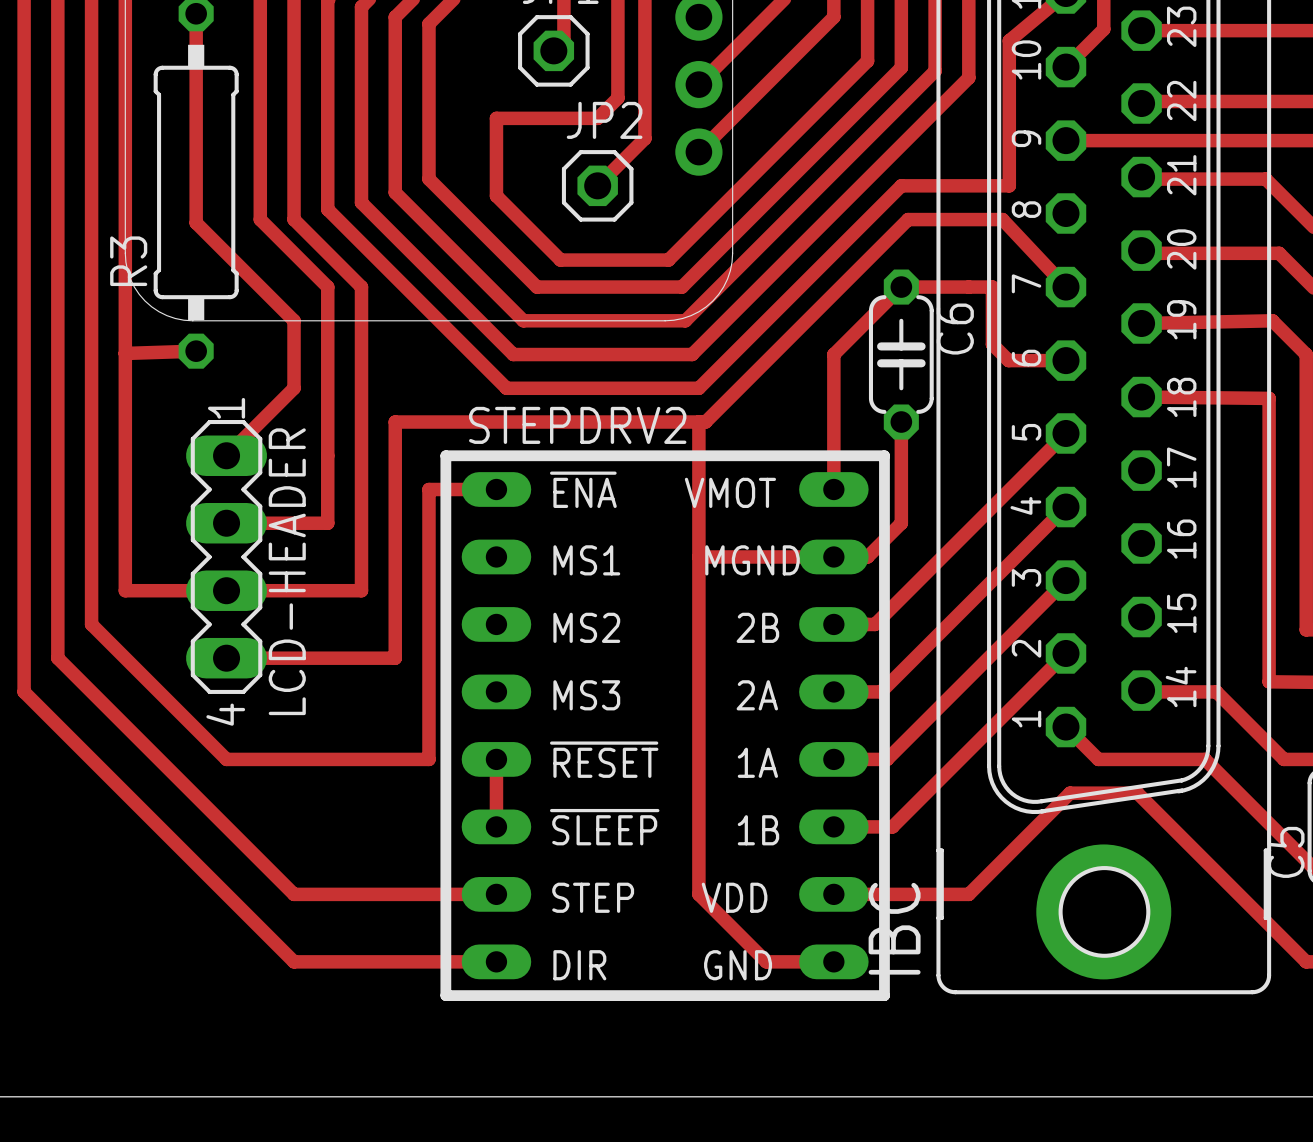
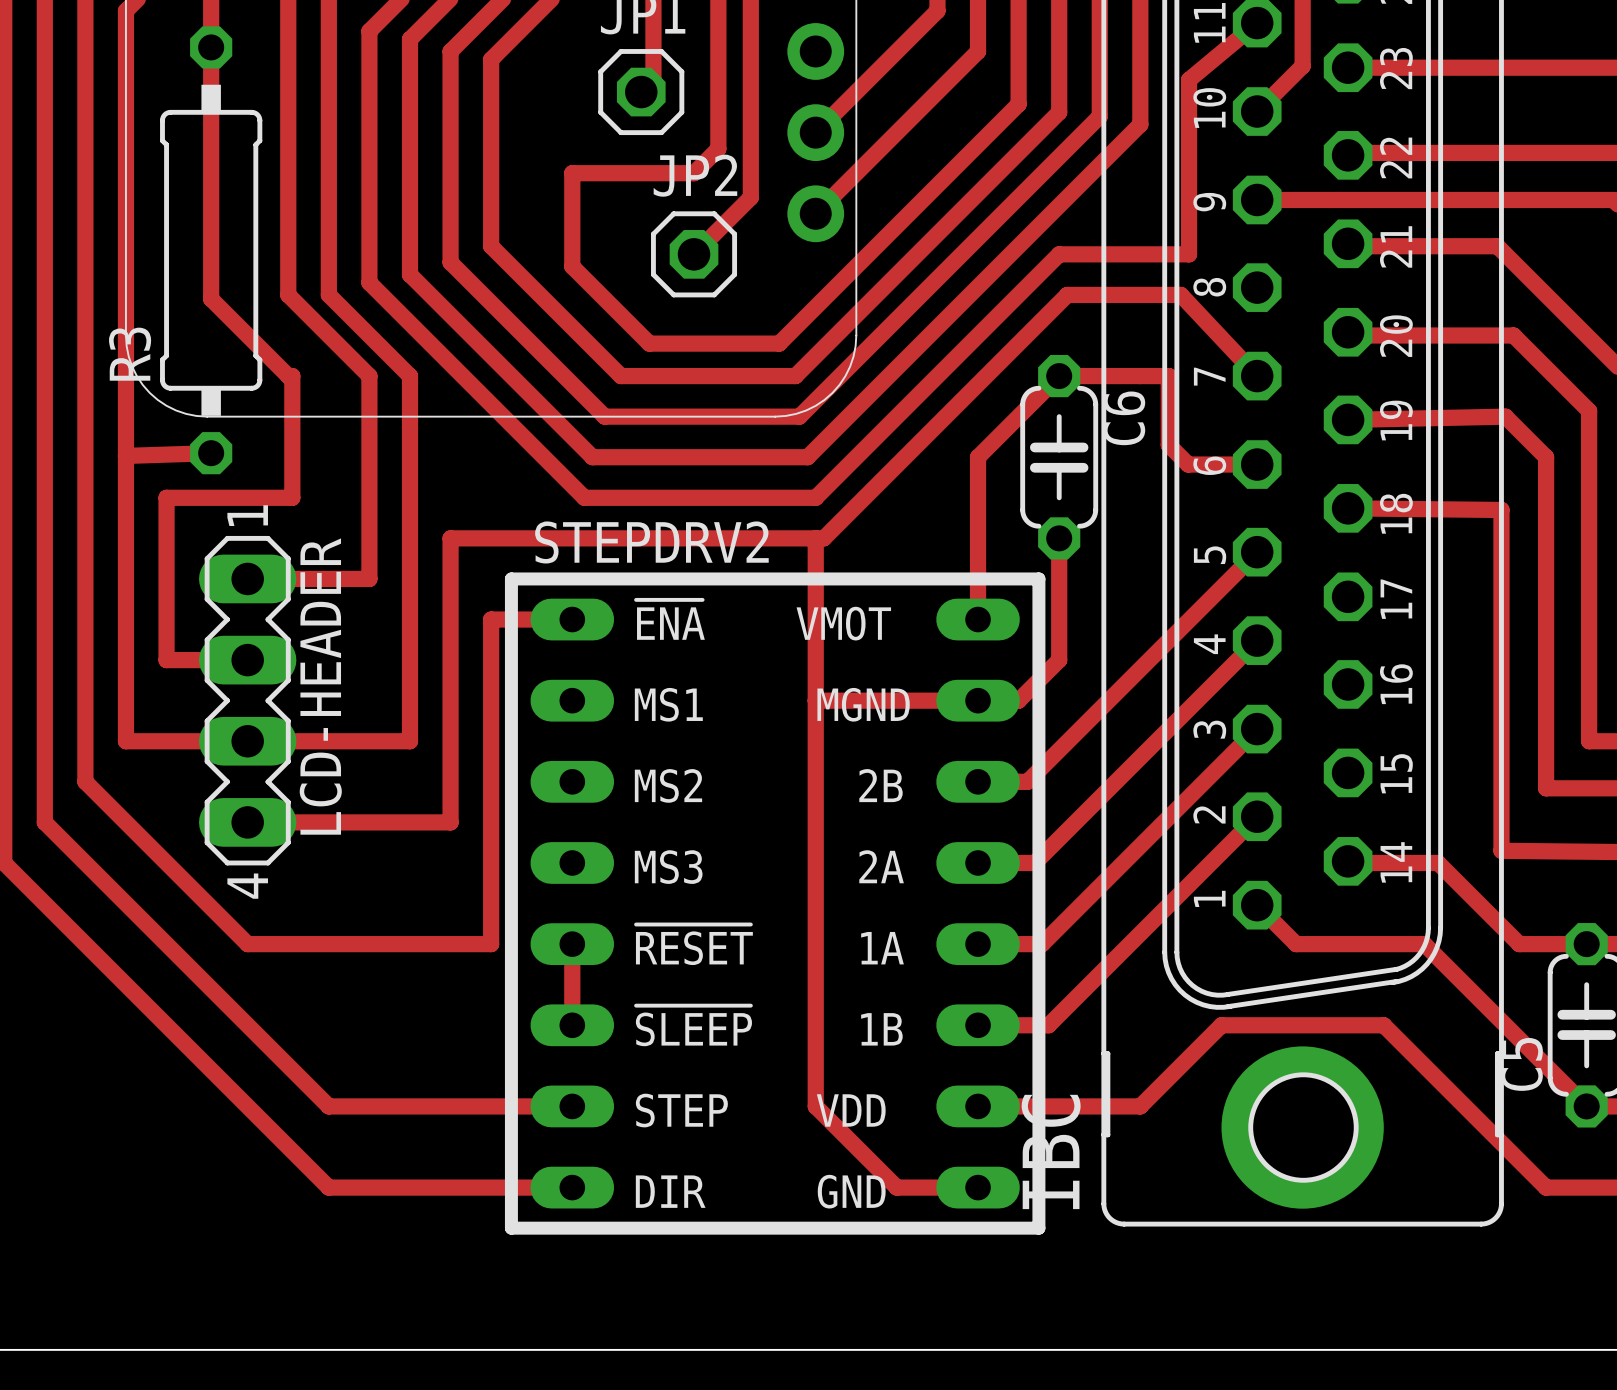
track: (260, 287) (294, 320) (294, 388) (226, 455) -> (288, 376) (292, 376) (292, 497) (166, 497) (166, 660) (247, 660)
track: (327, 455) (327, 523) (226, 523) -> (369, 578) (247, 578)
track: (1036, 826) (1070, 793) (1137, 793) (1171, 826) -> (1221, 1025) (1383, 1025)

